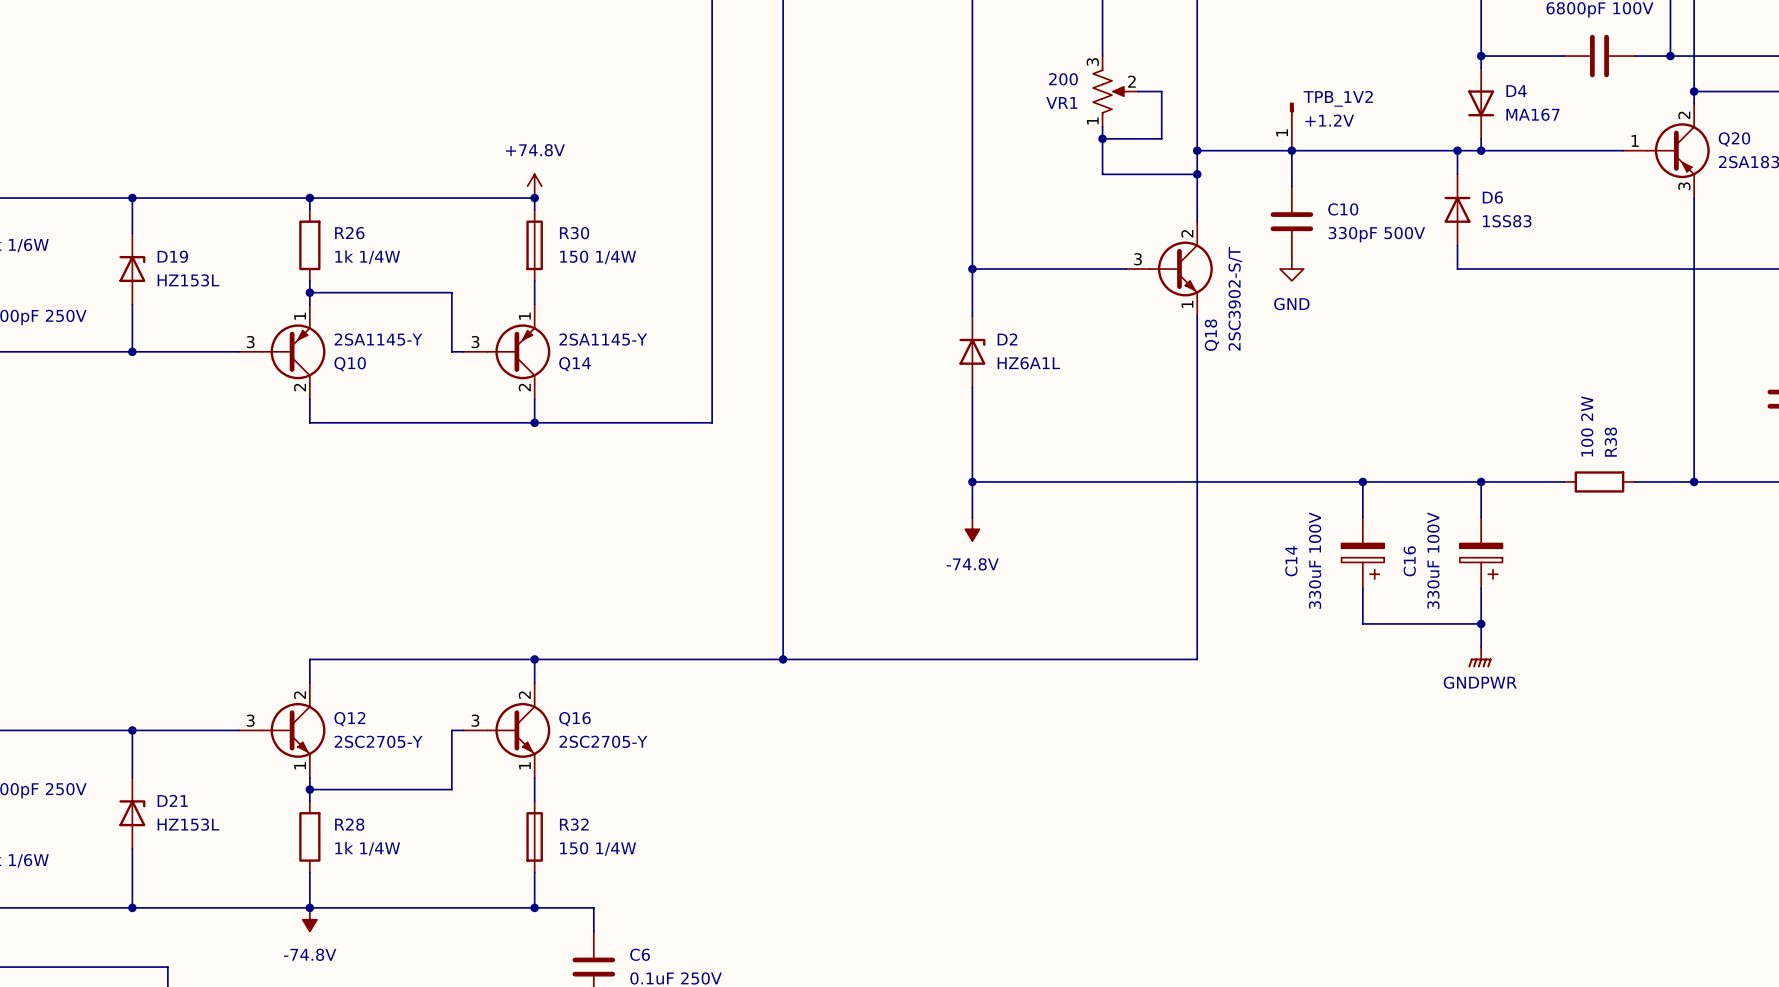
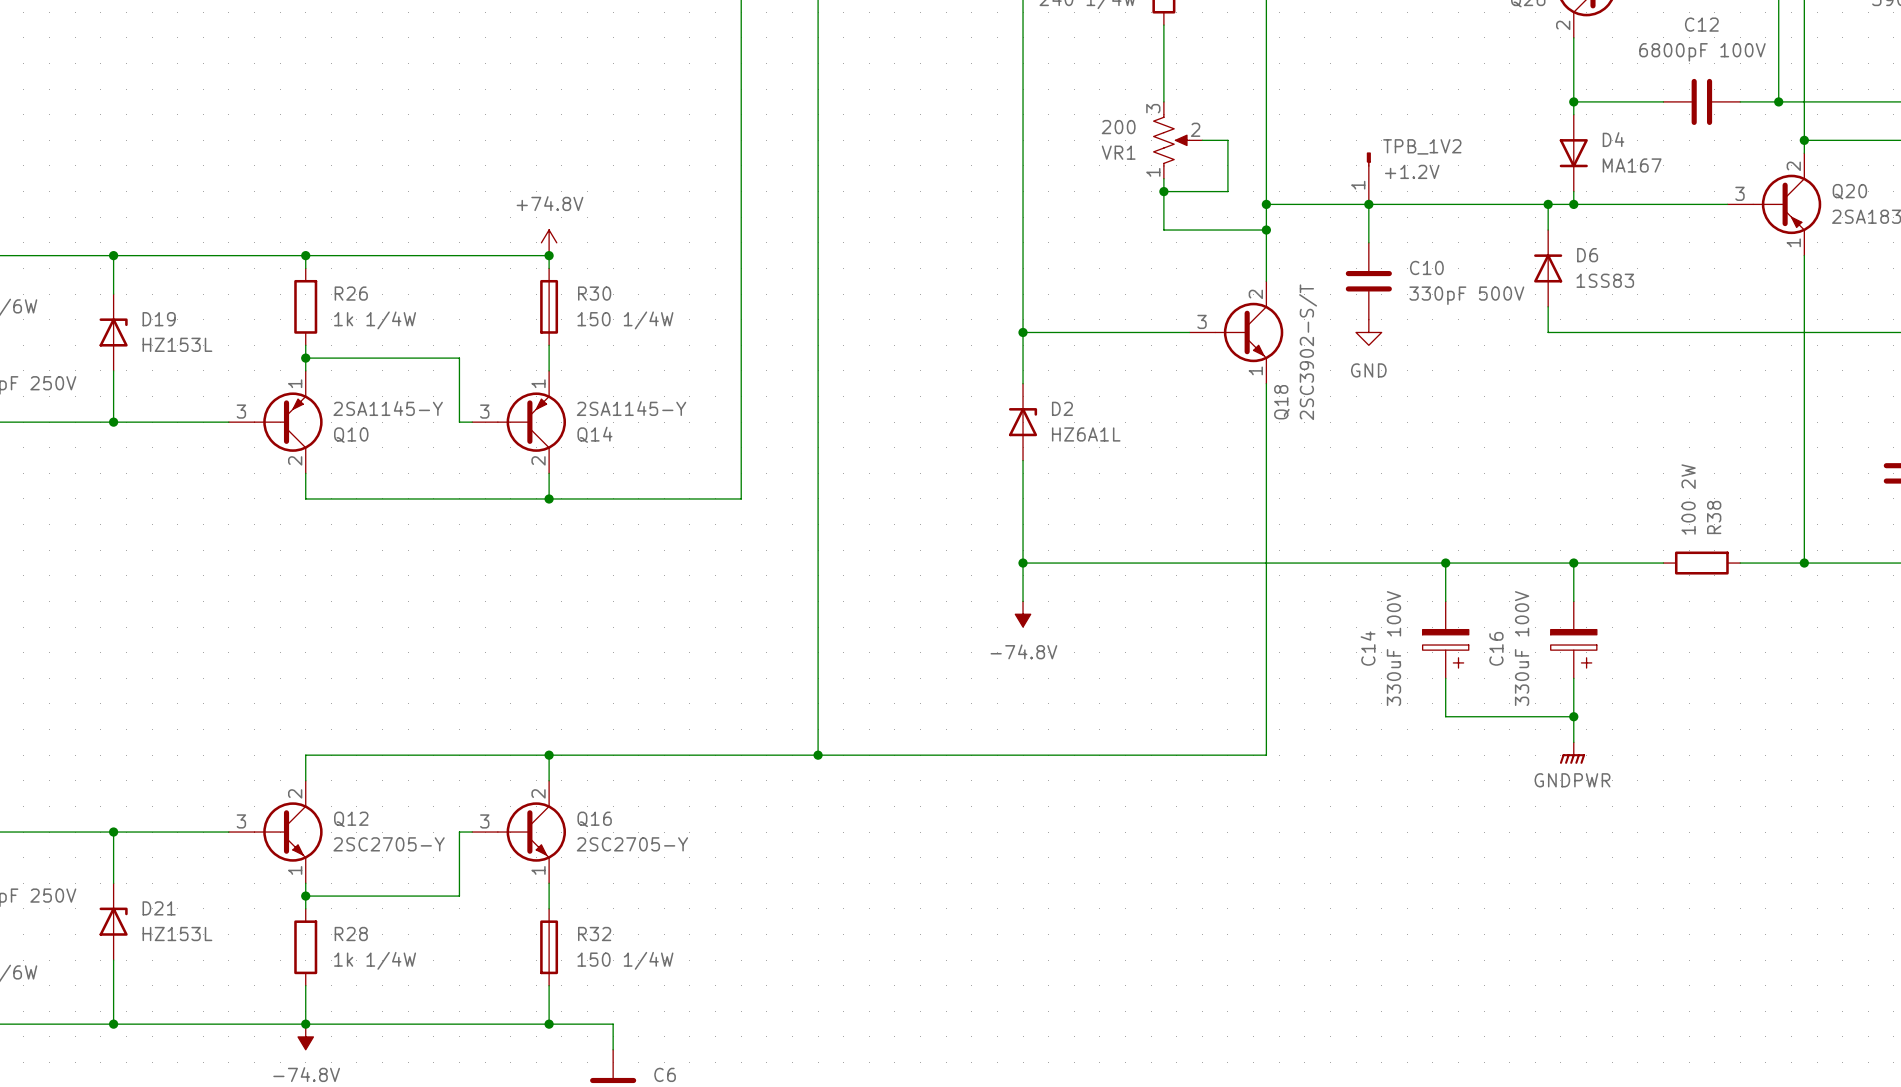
Q20 pin number: 1 (1635, 140) -> 3 (1739, 193)
Q20 pin number: 3 (1684, 186) -> 1 (1793, 242)

